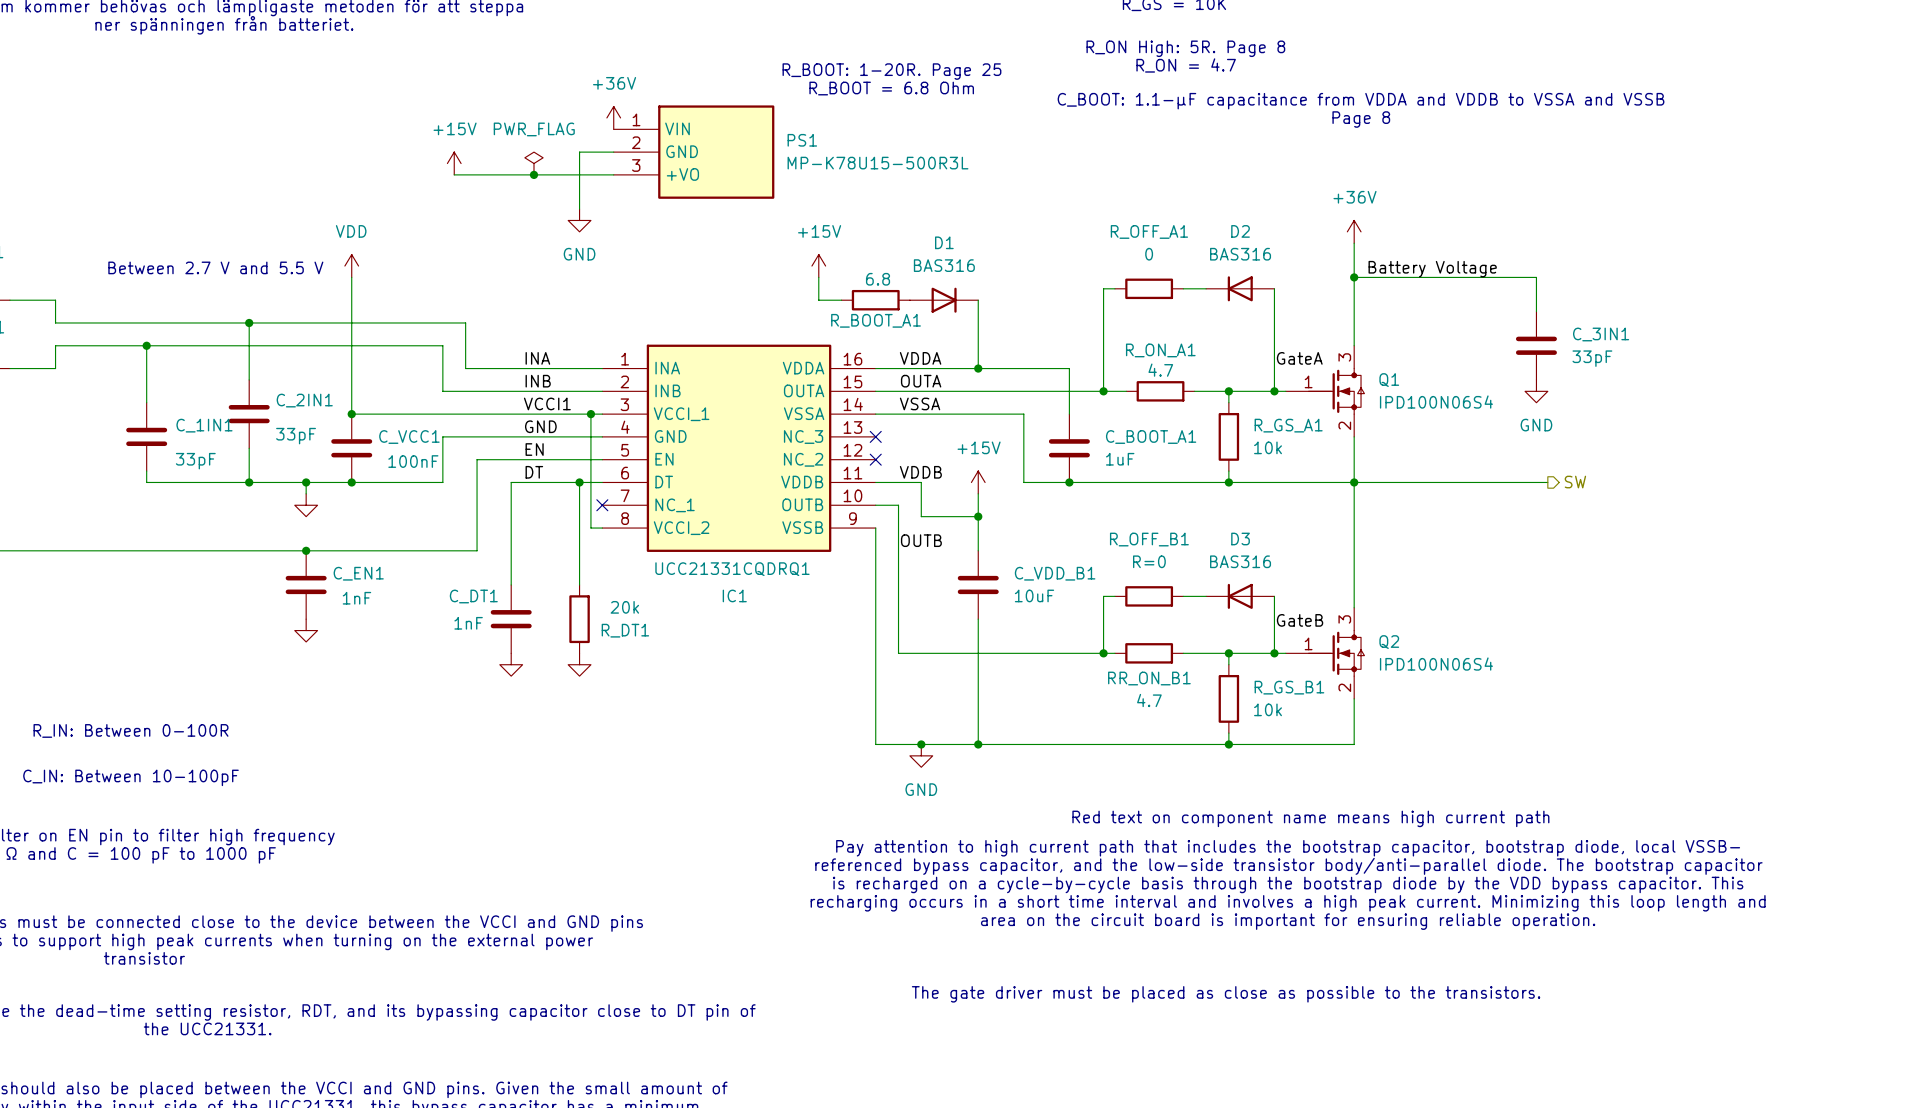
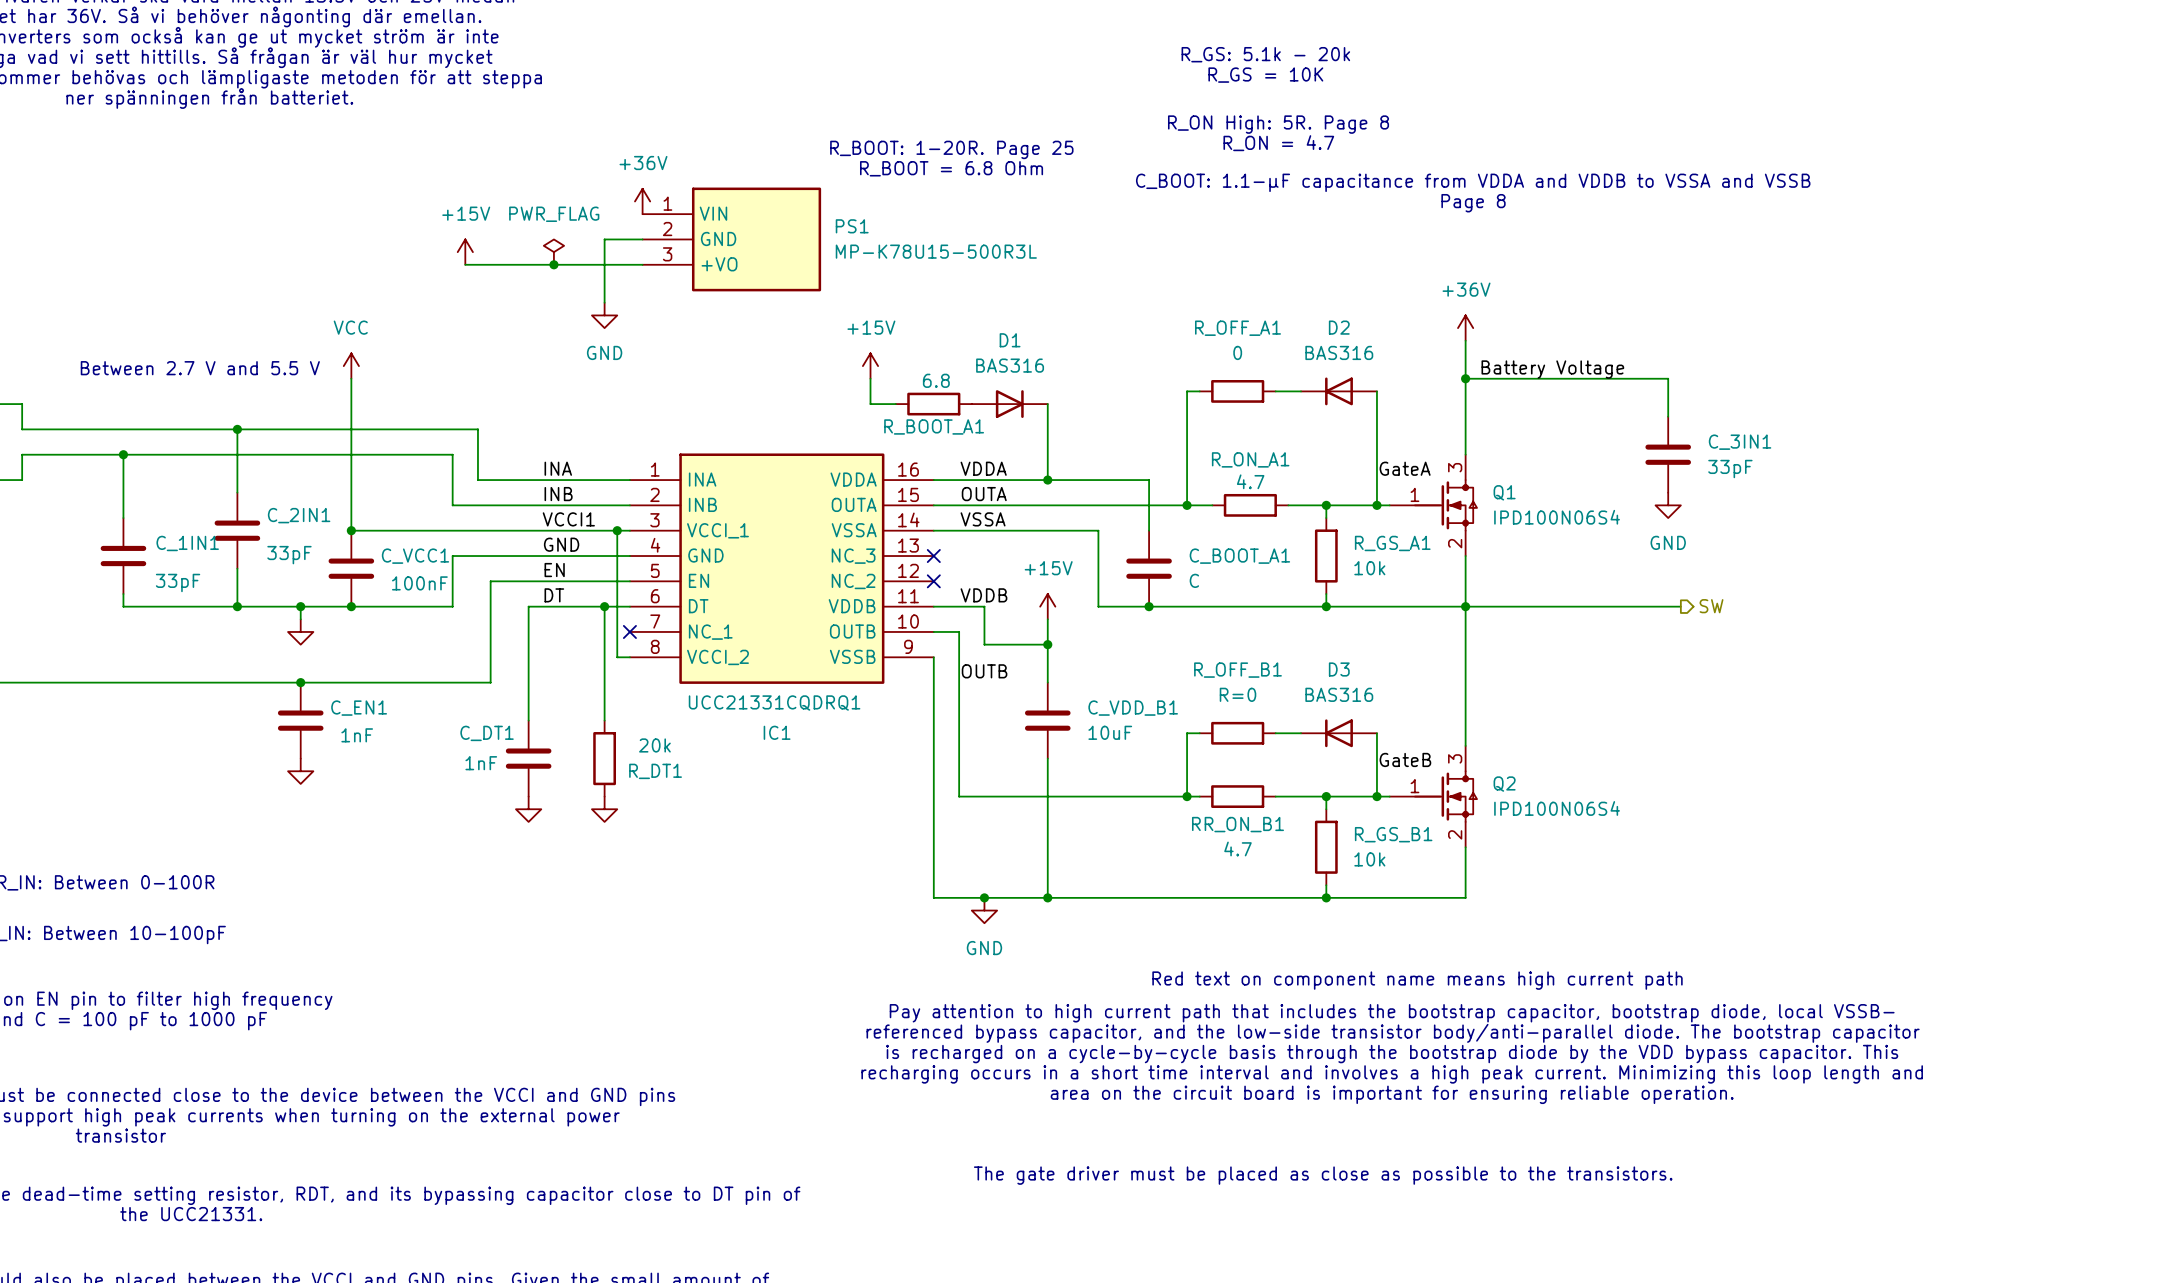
power symbol: VDD (351, 266) -> VCC (351, 366)
C_BOOT_A1 value: 1uF (1120, 459) -> C (1194, 580)

